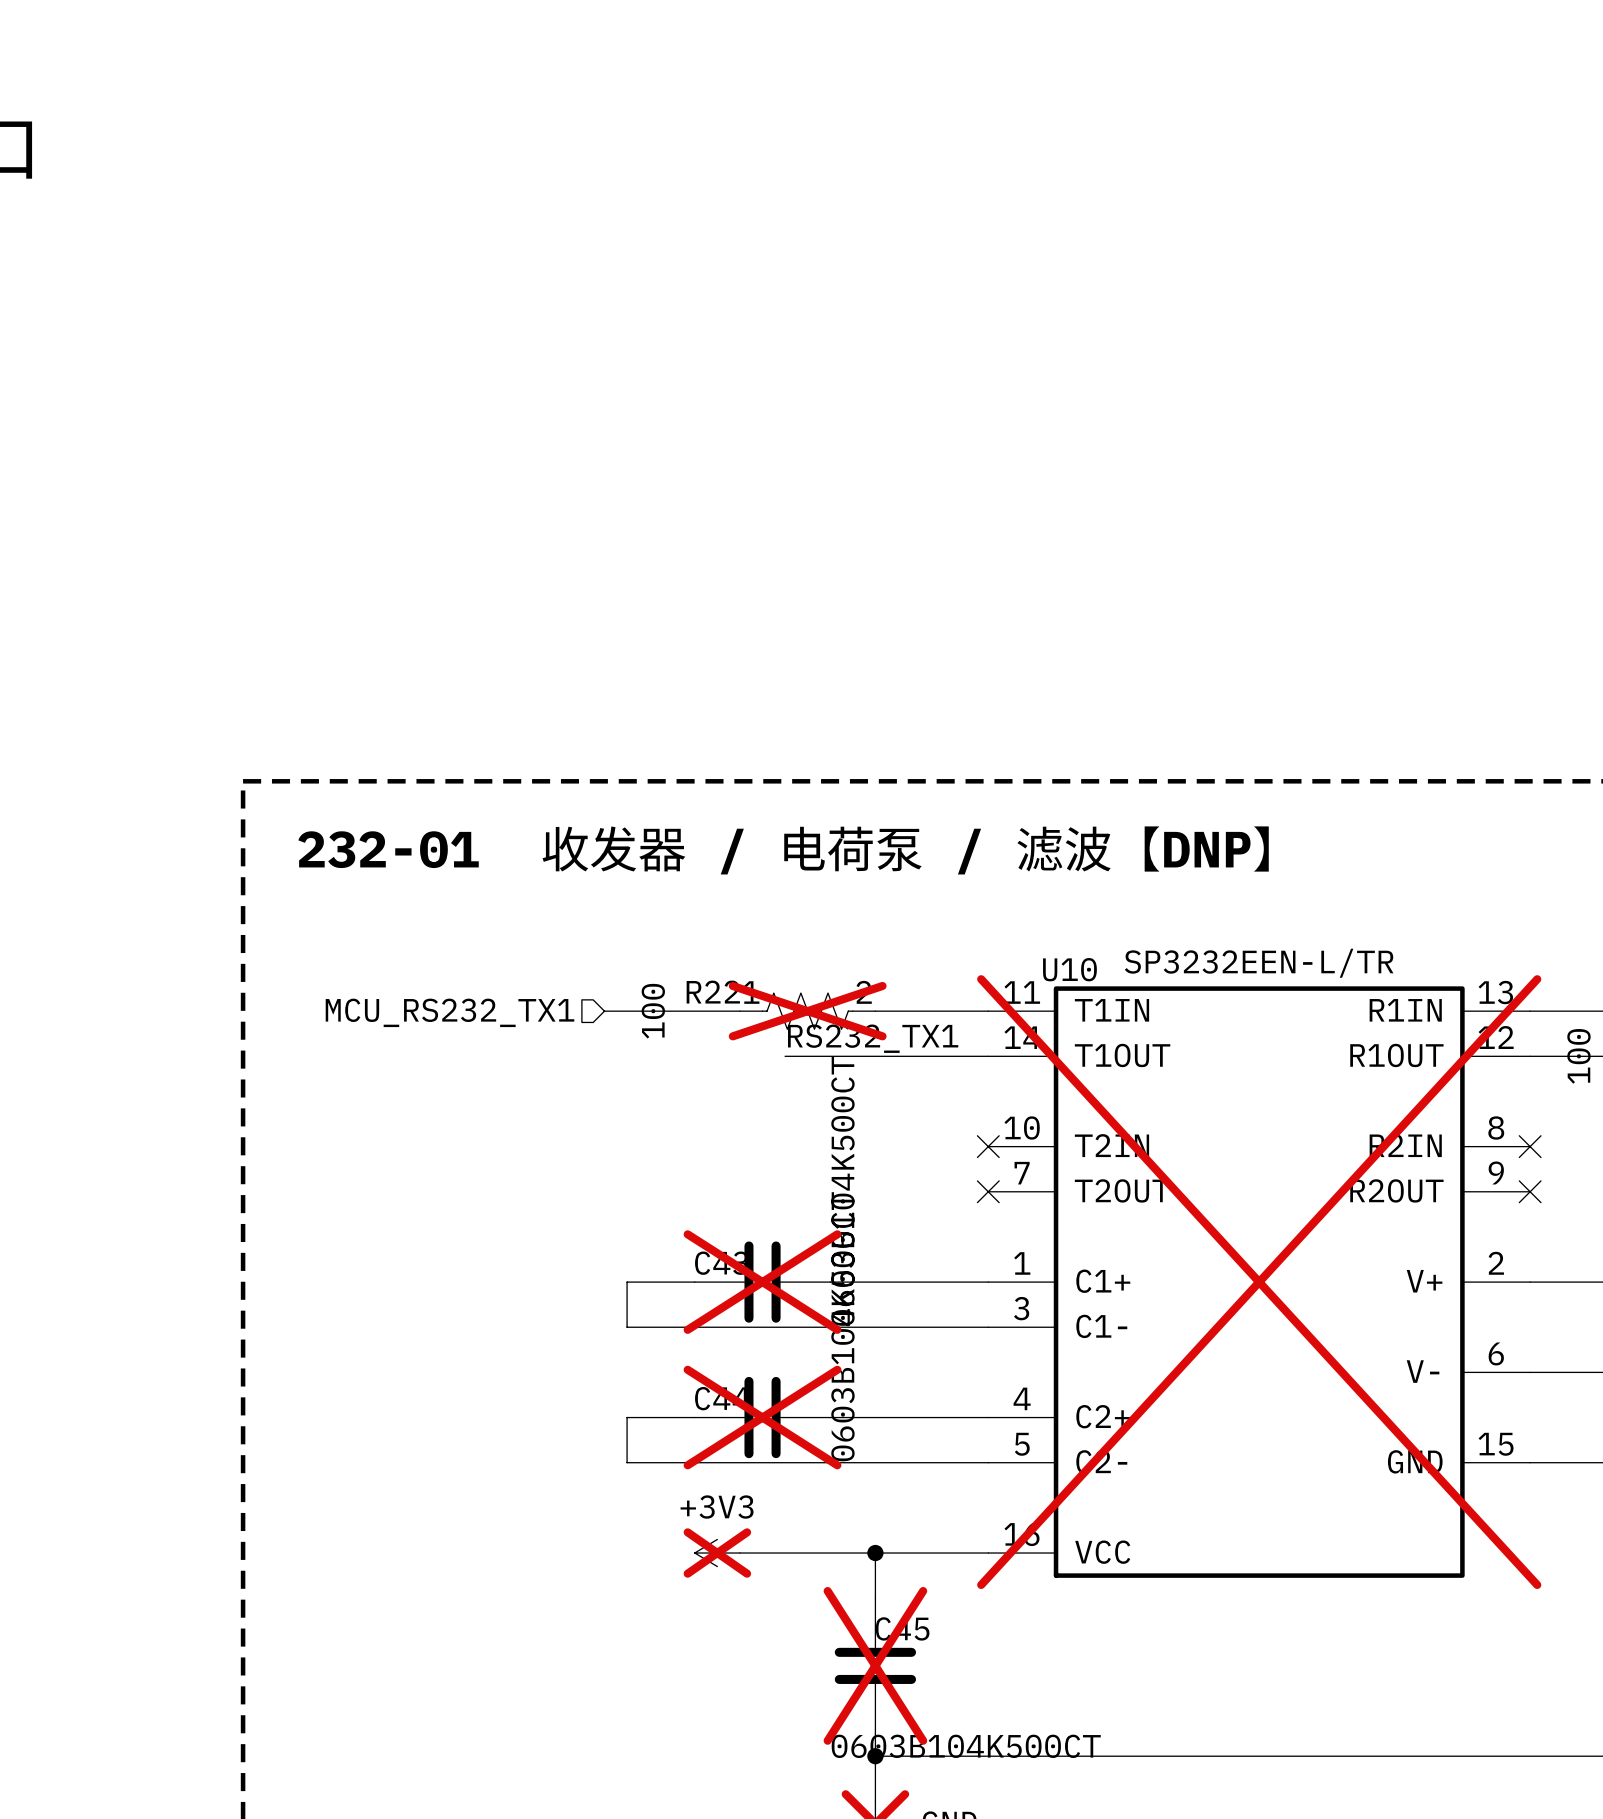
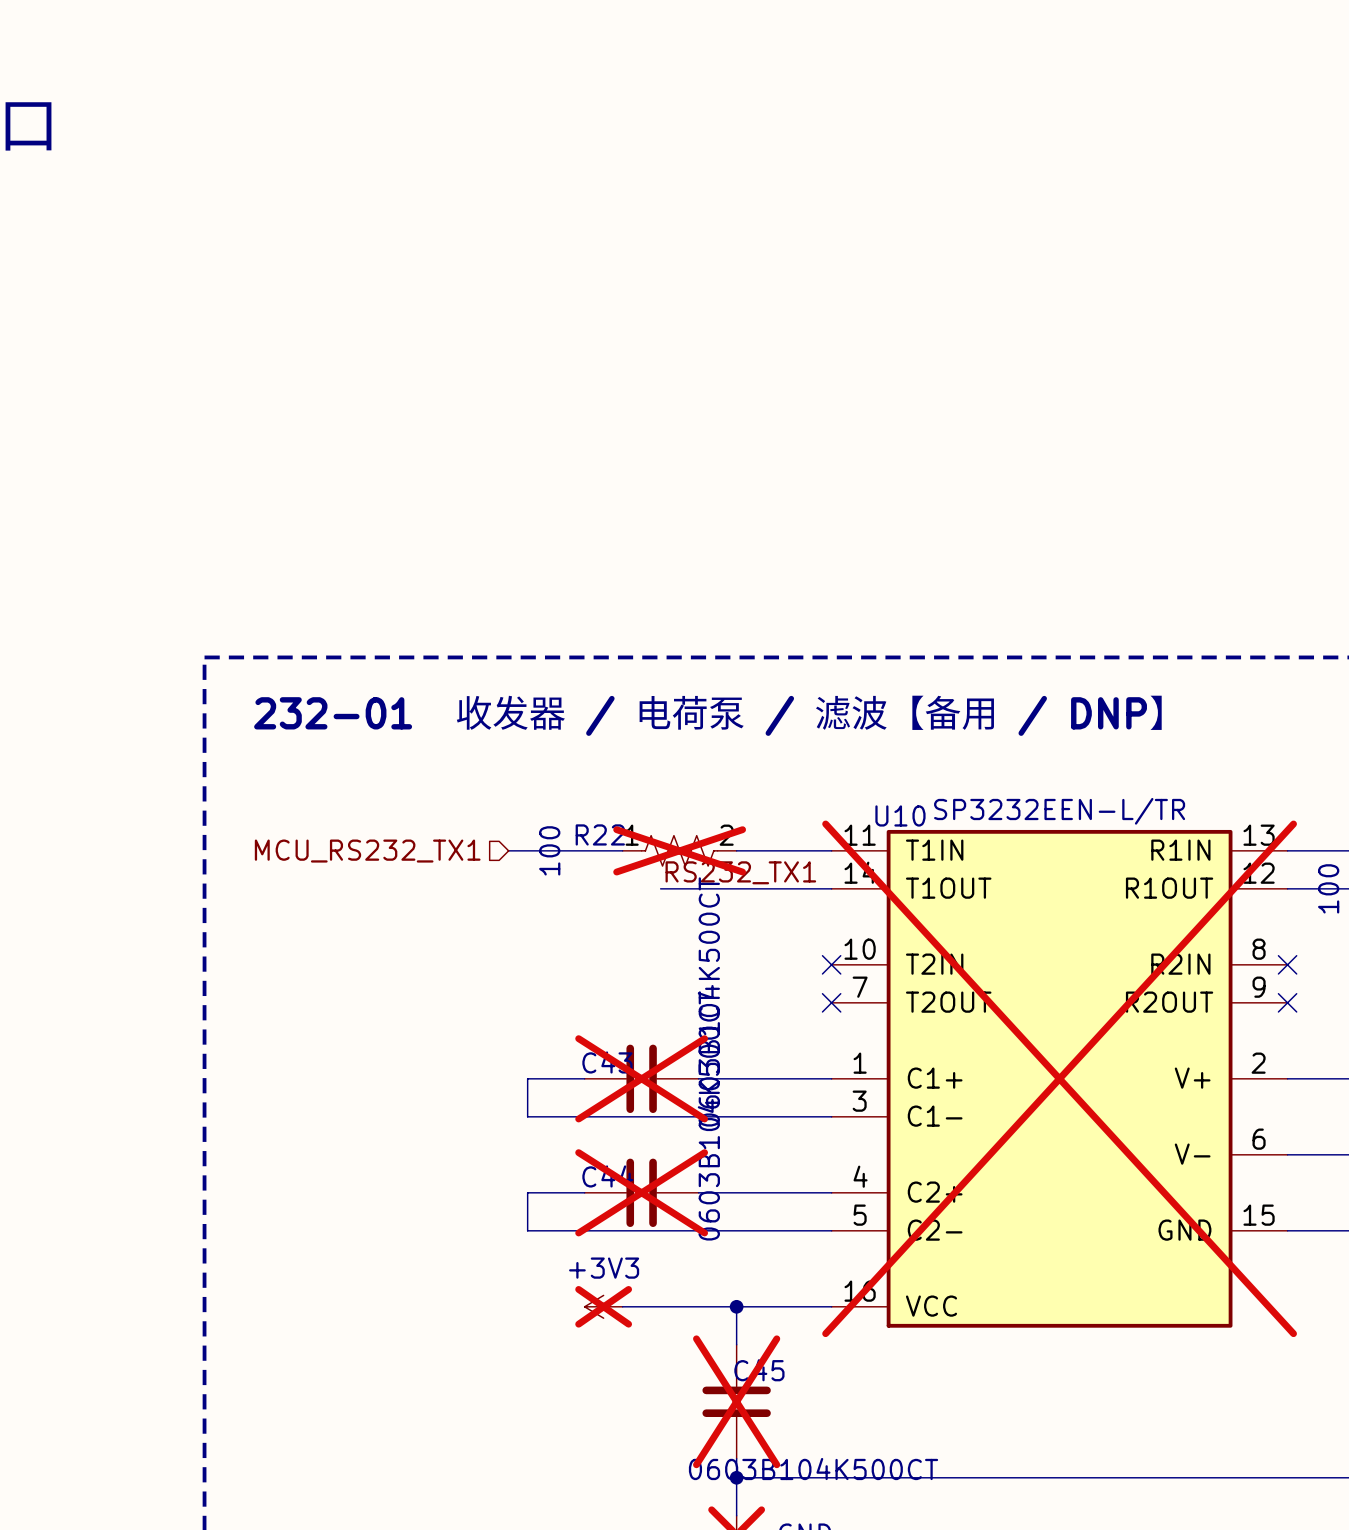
text: 232-01 收发器 / 电荷泵 / 滤波【DNP】 (783, 850) -> 232-01 收发器 / 电荷泵 / 滤波【备用 / DNP】 (709, 714)

